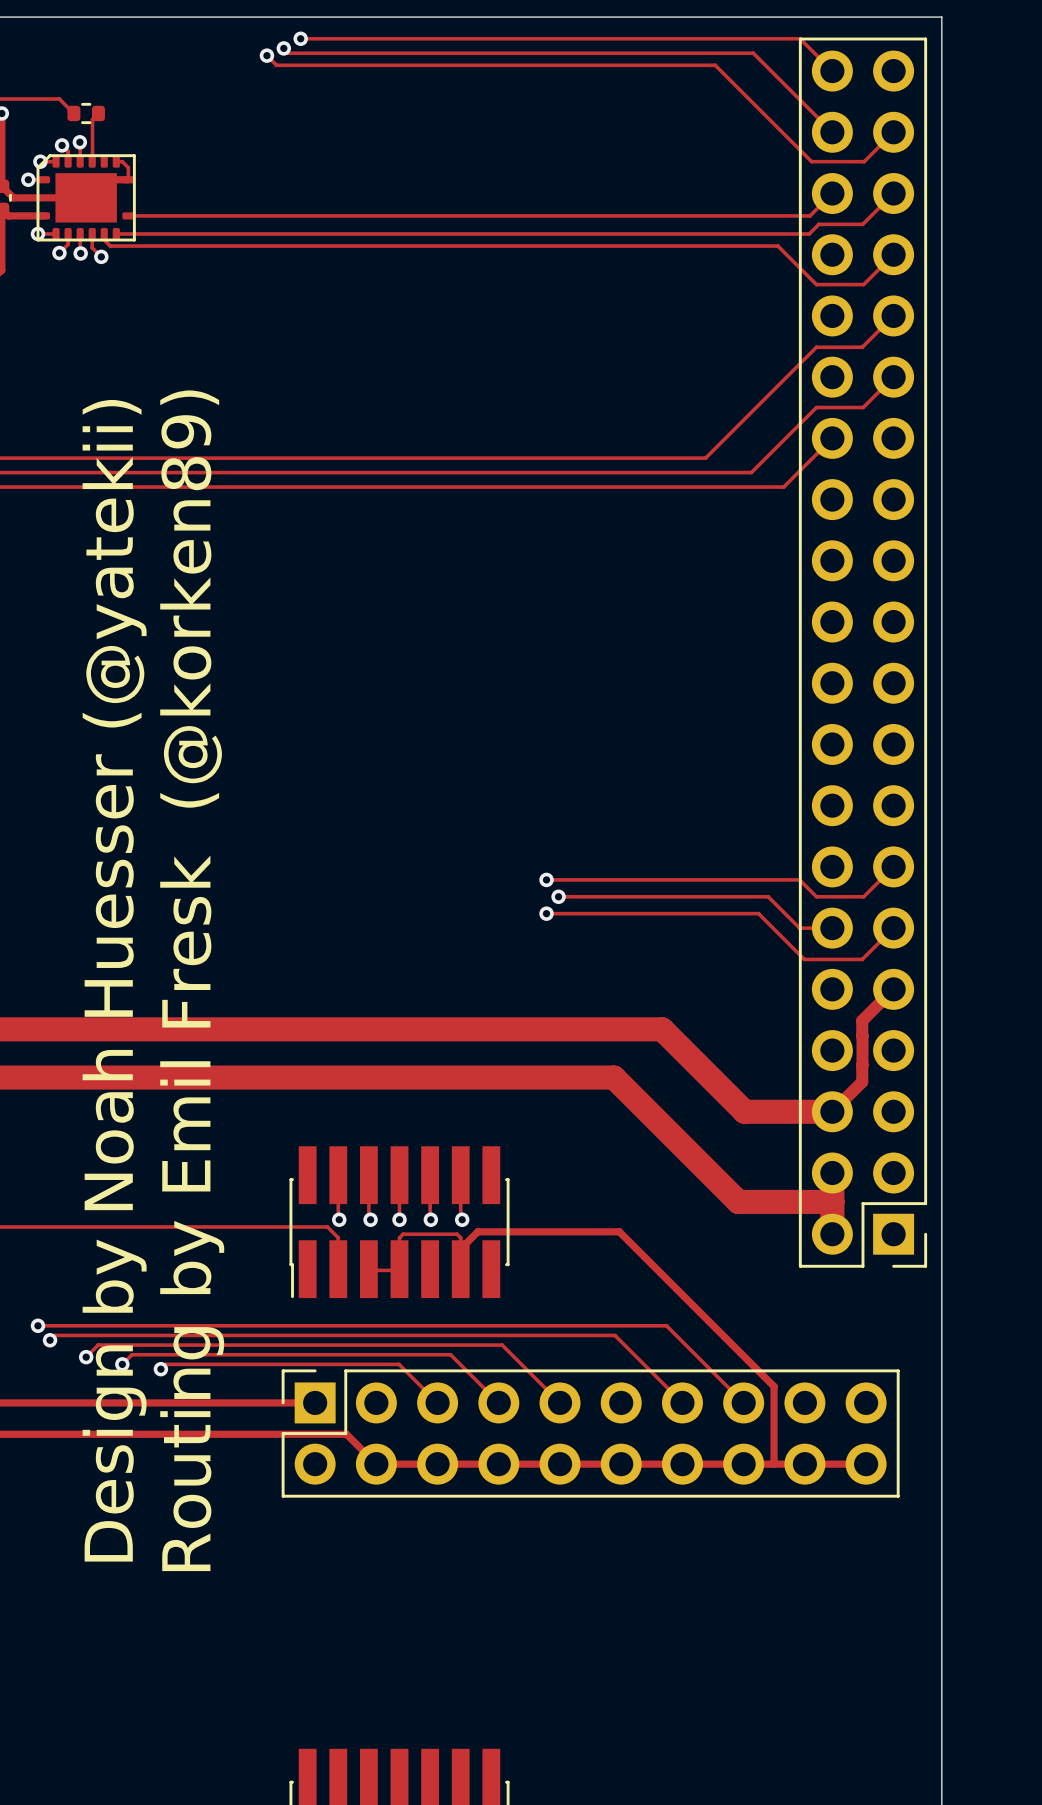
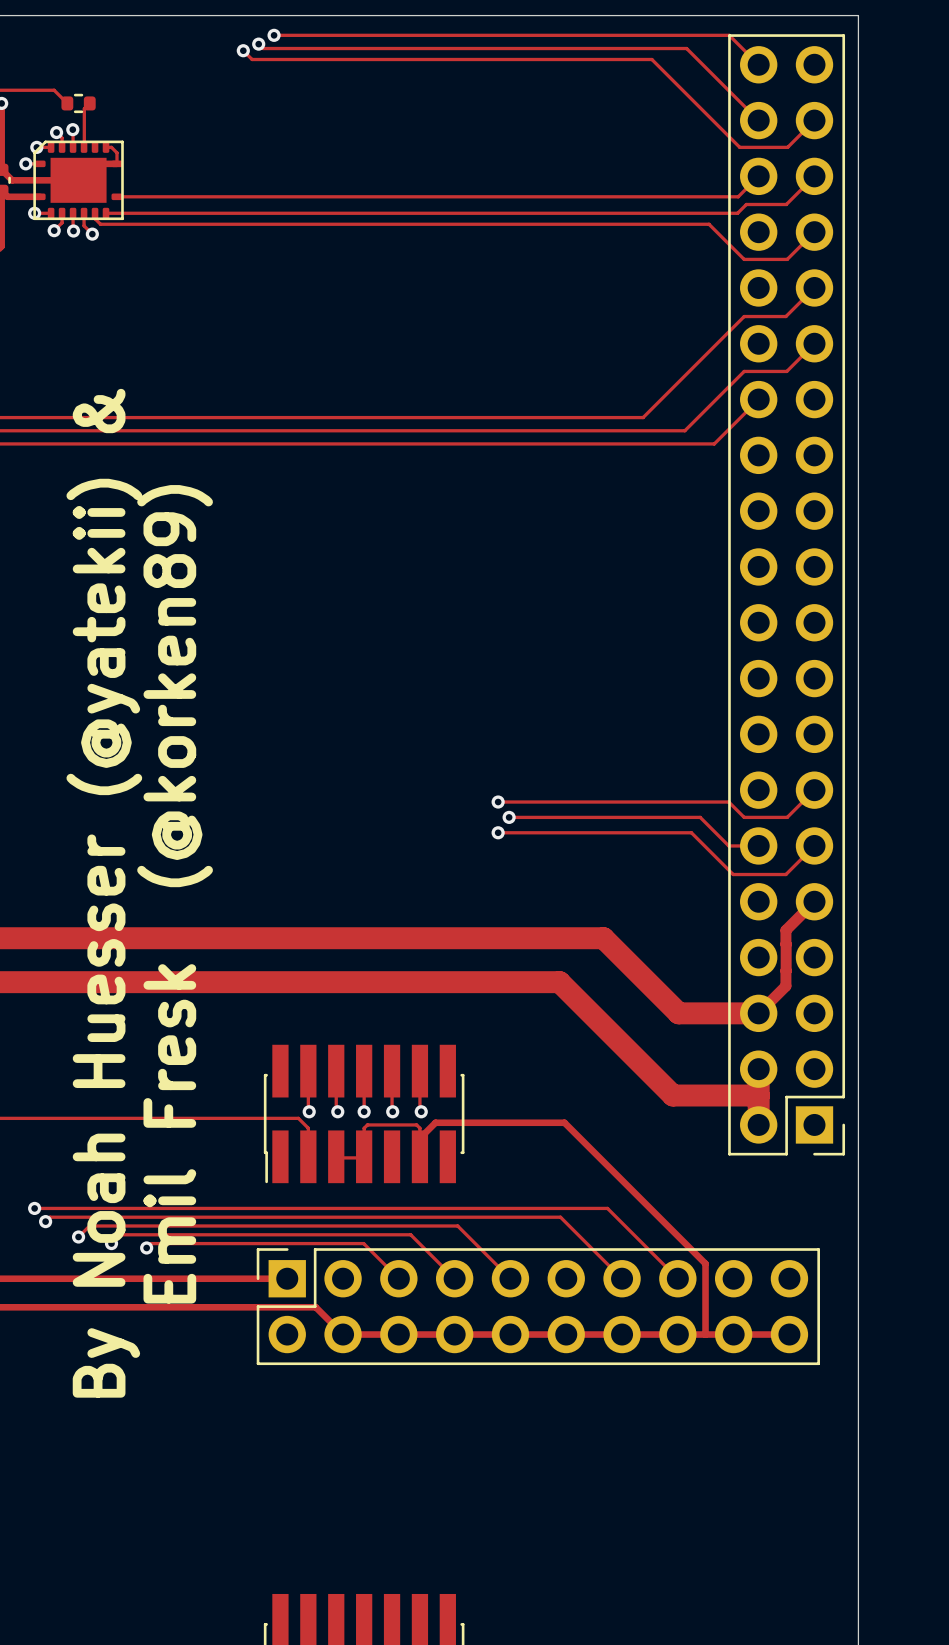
text: Design by Noah Huesser (@yatekii) (114, 980) -> By Noah Huesser (@yatekii) & (104, 893)
text: Routing by Emil Fresk (@korken89) (192, 980) -> Emil Fresk (@korken89) (175, 894)

